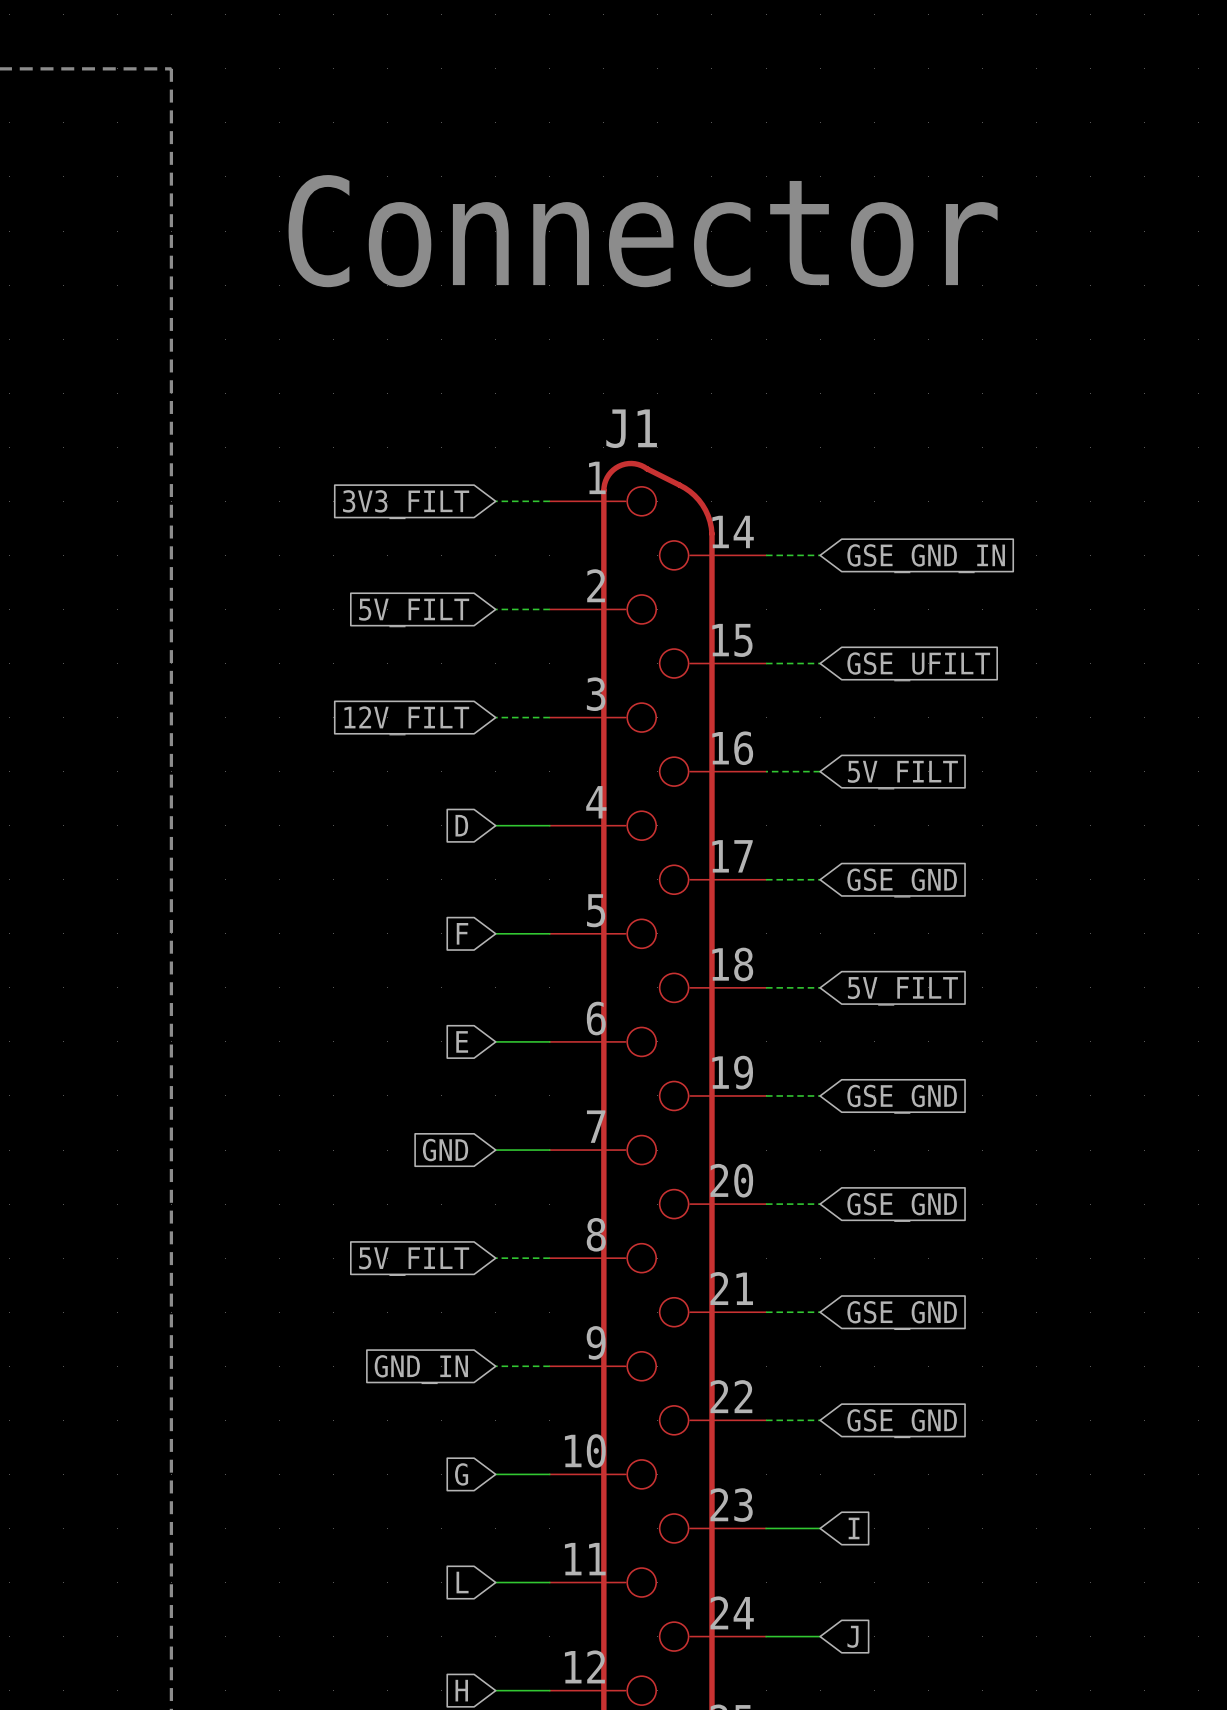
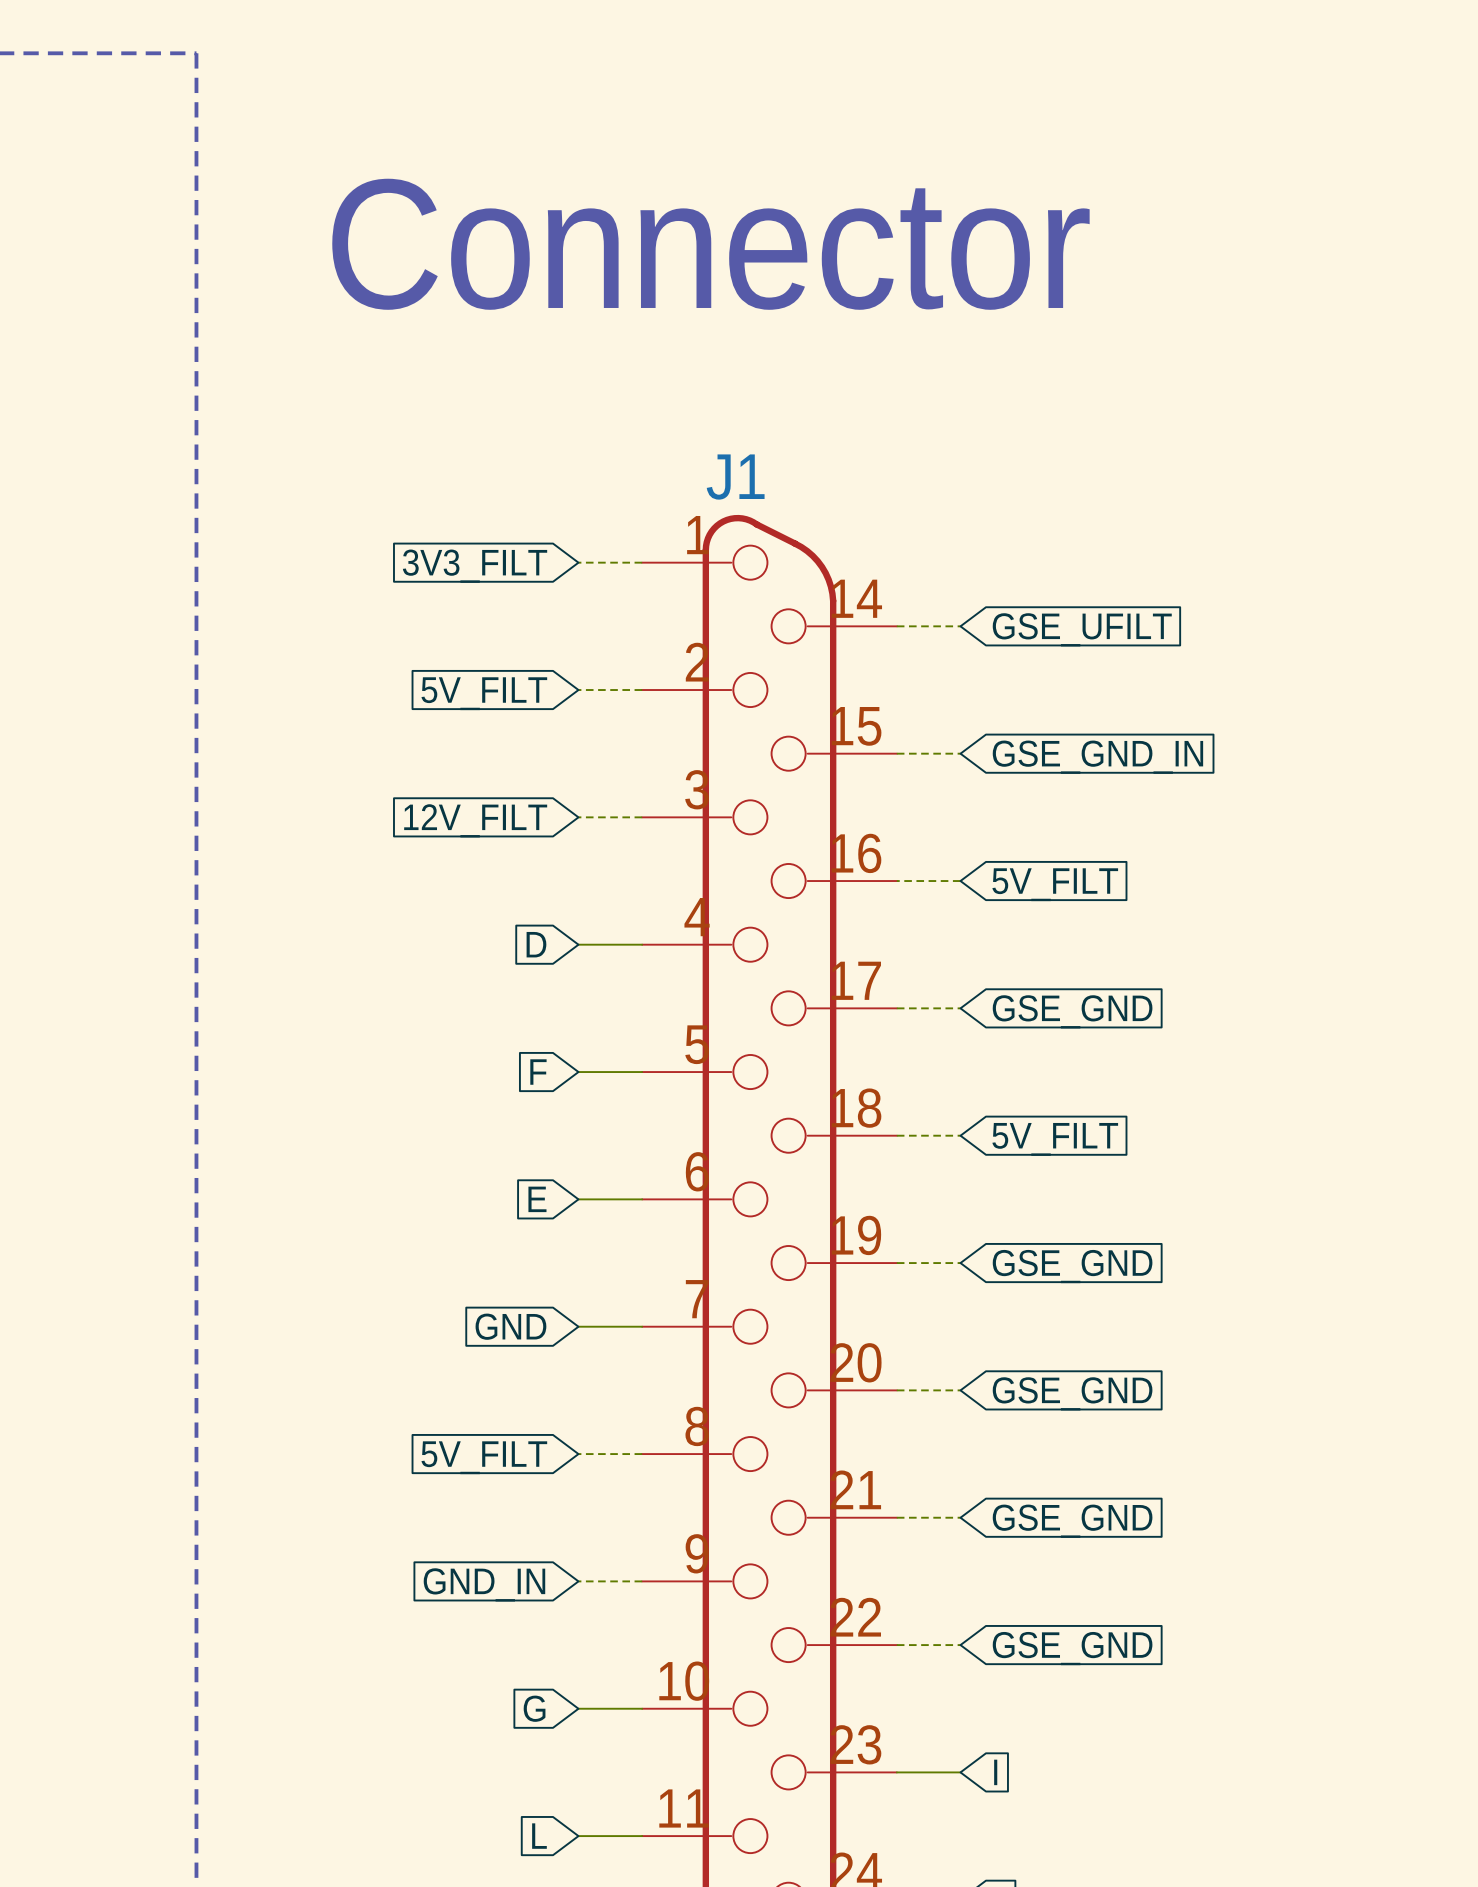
global label: GSE_GND_IN (926, 558) -> GSE_UFILT (1082, 629)
global label: GSE_UFILT (918, 666) -> GSE_GND_IN (1097, 757)

